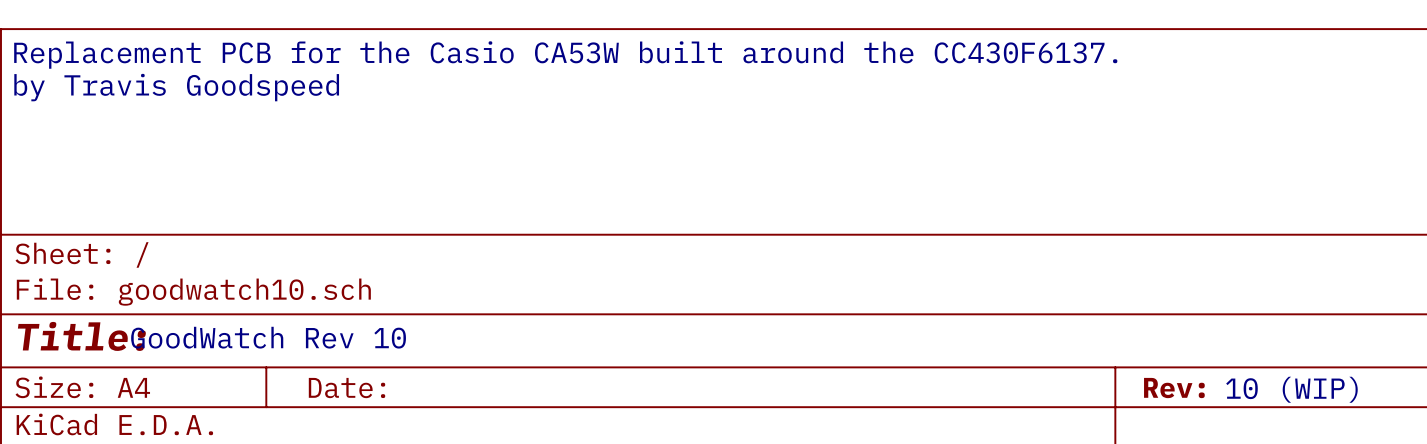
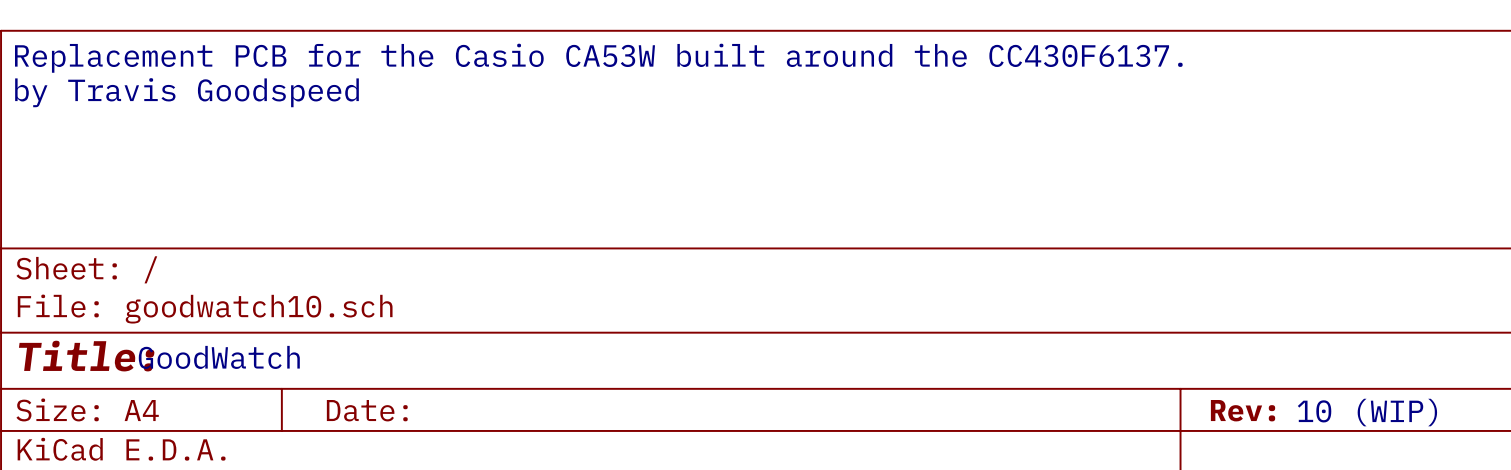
text: GoodWatch Rev 10 (268, 337) -> GoodWatch (219, 357)

